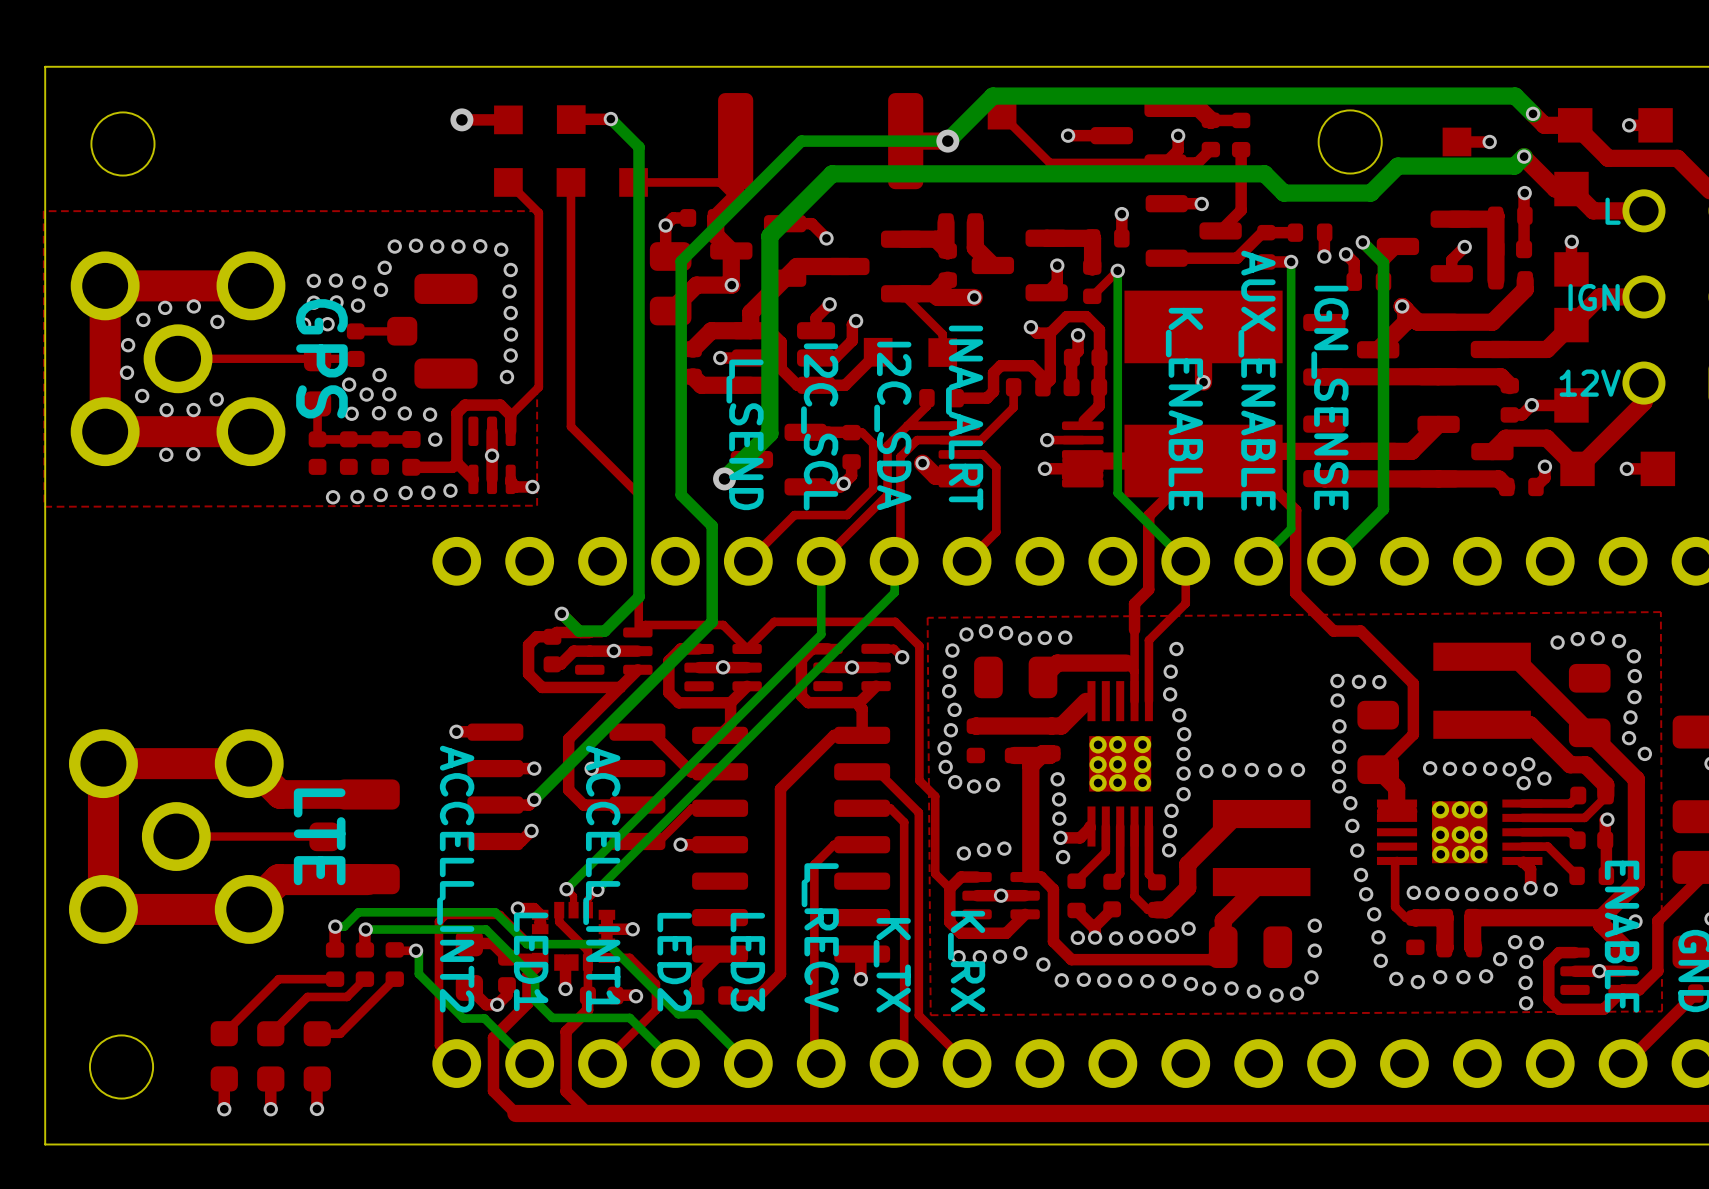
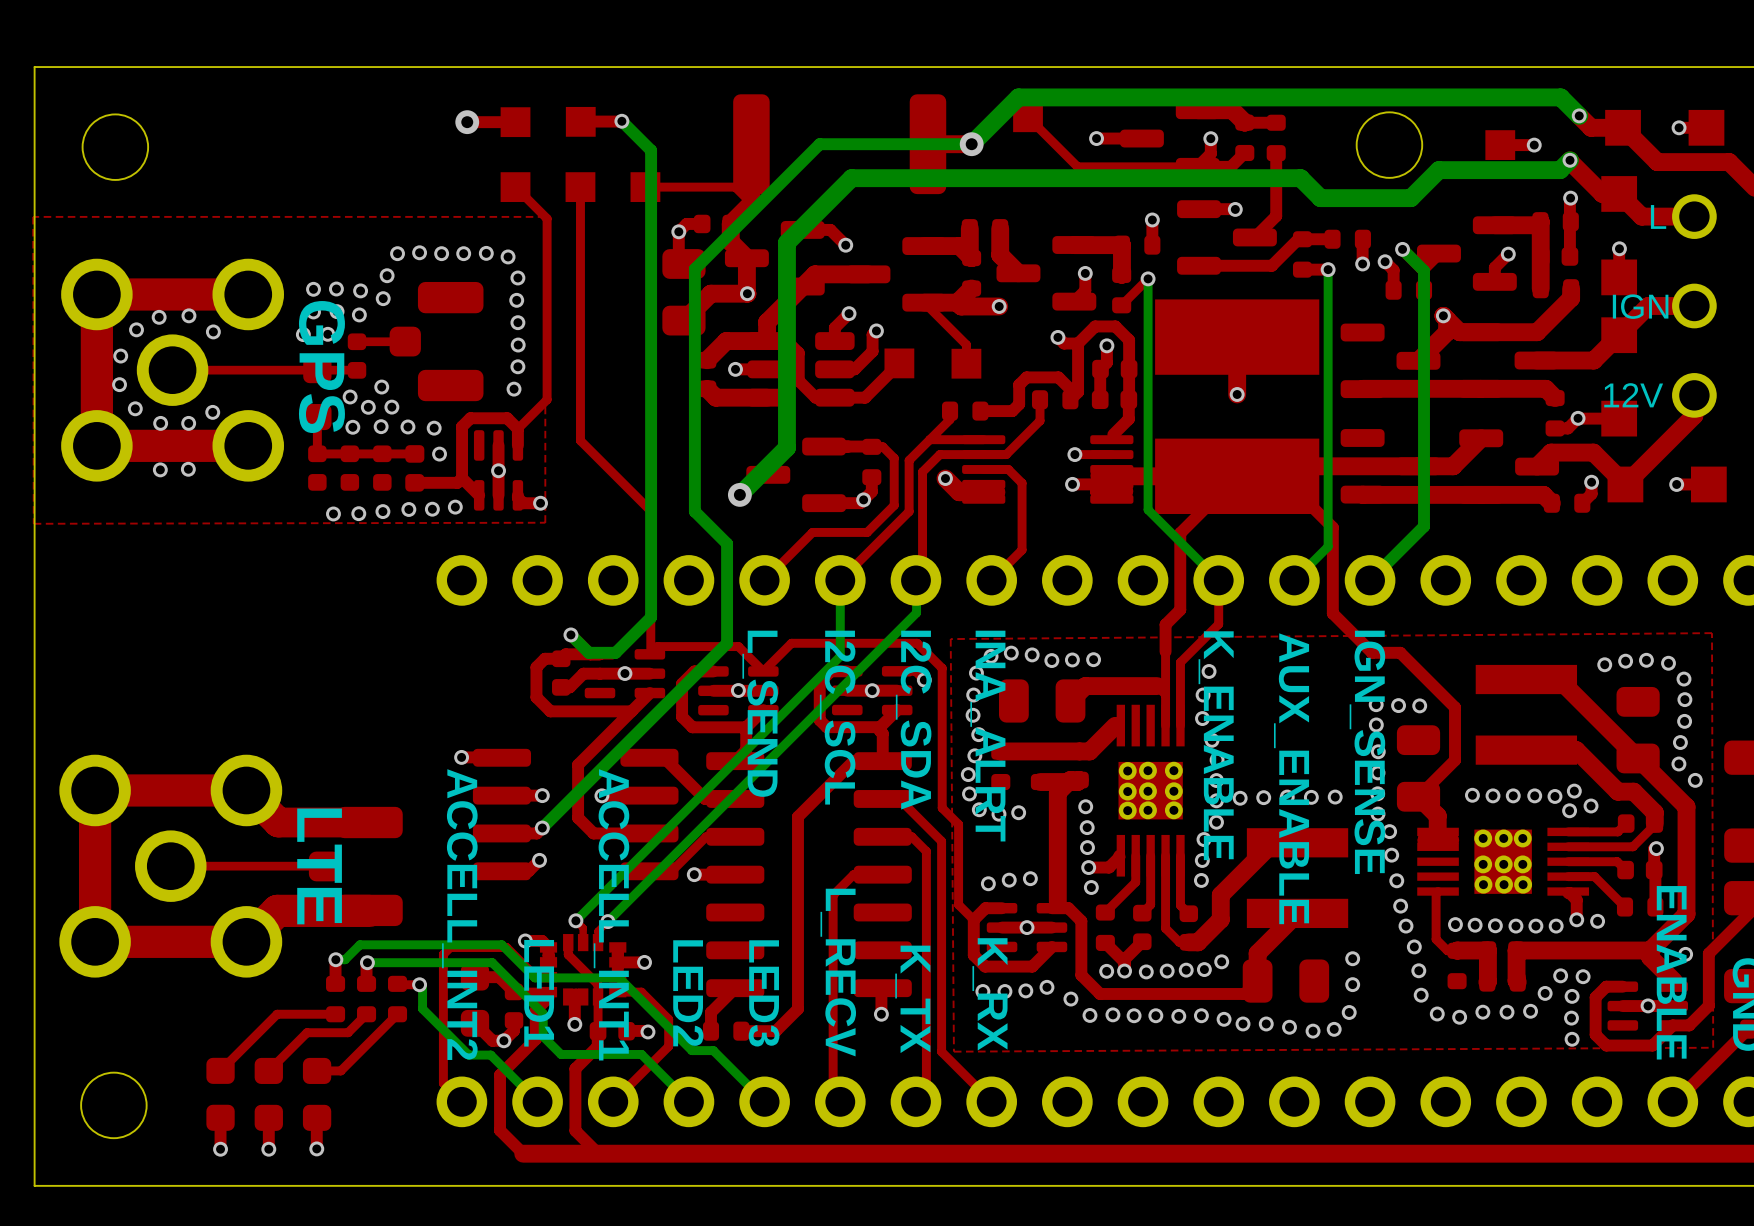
text position: AUX_ENABLE (1257, 380) -> AUX_ENABLE (1291, 778)
text position: IGN_SENSE (1329, 397) -> IGN_SENSE (1367, 752)
text position: K_ENABLE (1184, 409) -> K_ENABLE (1216, 745)
text position: INA_ALRT (964, 418) -> INA_ALRT (987, 736)
text position: I2C_SDA (892, 425) -> I2C_SDA (913, 720)
text position: I2C_SCL (819, 426) -> I2C_SCL (837, 717)
text position: L_SEND (745, 434) -> L_SEND (760, 713)

